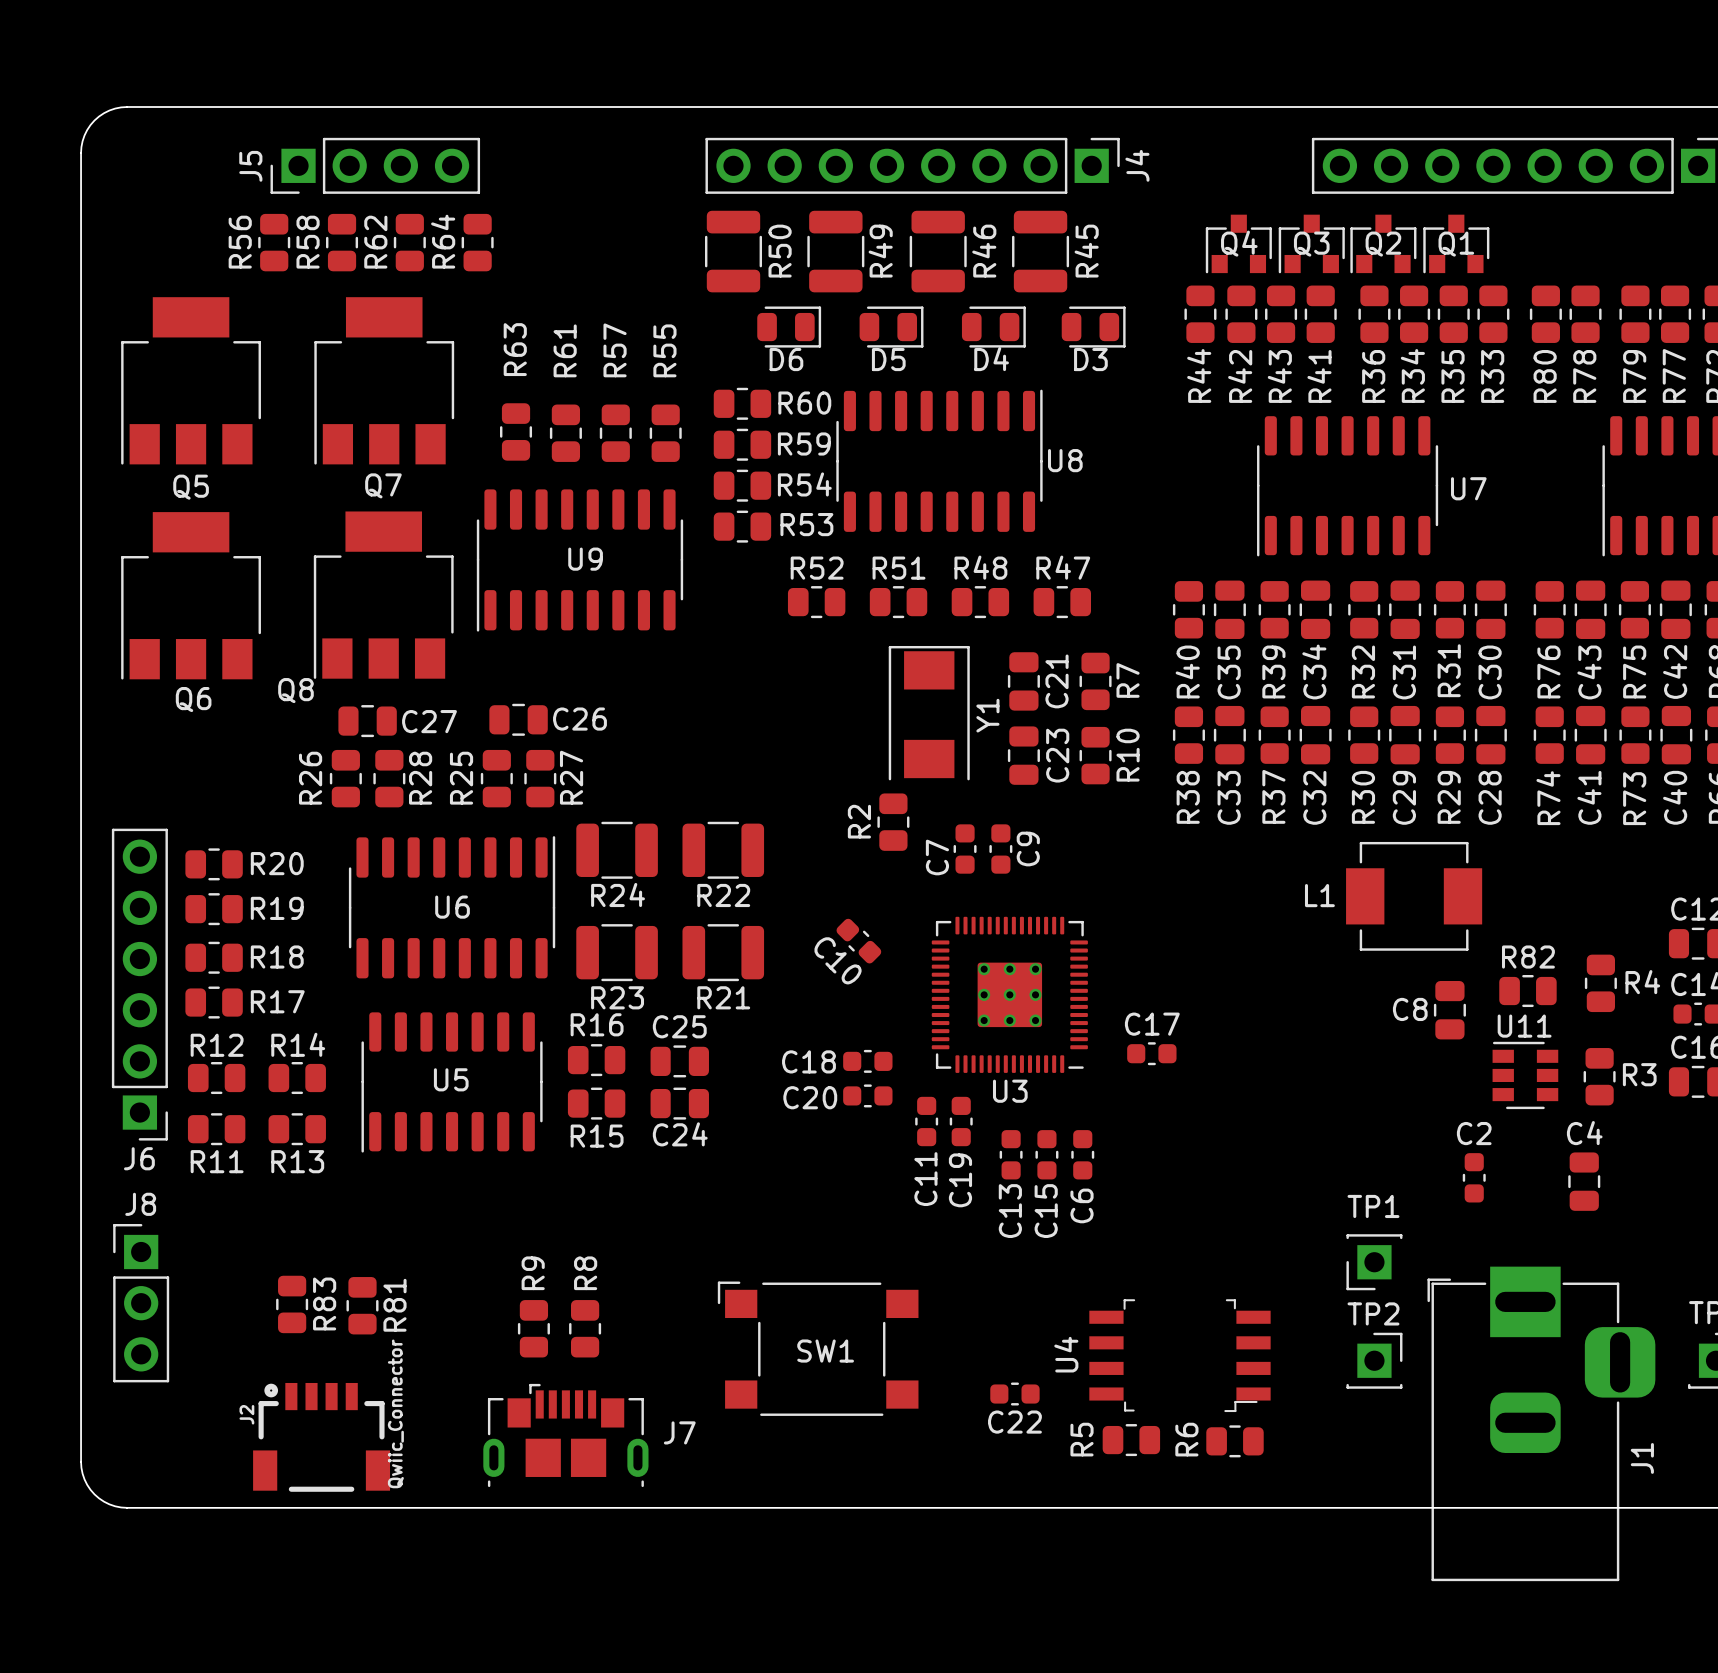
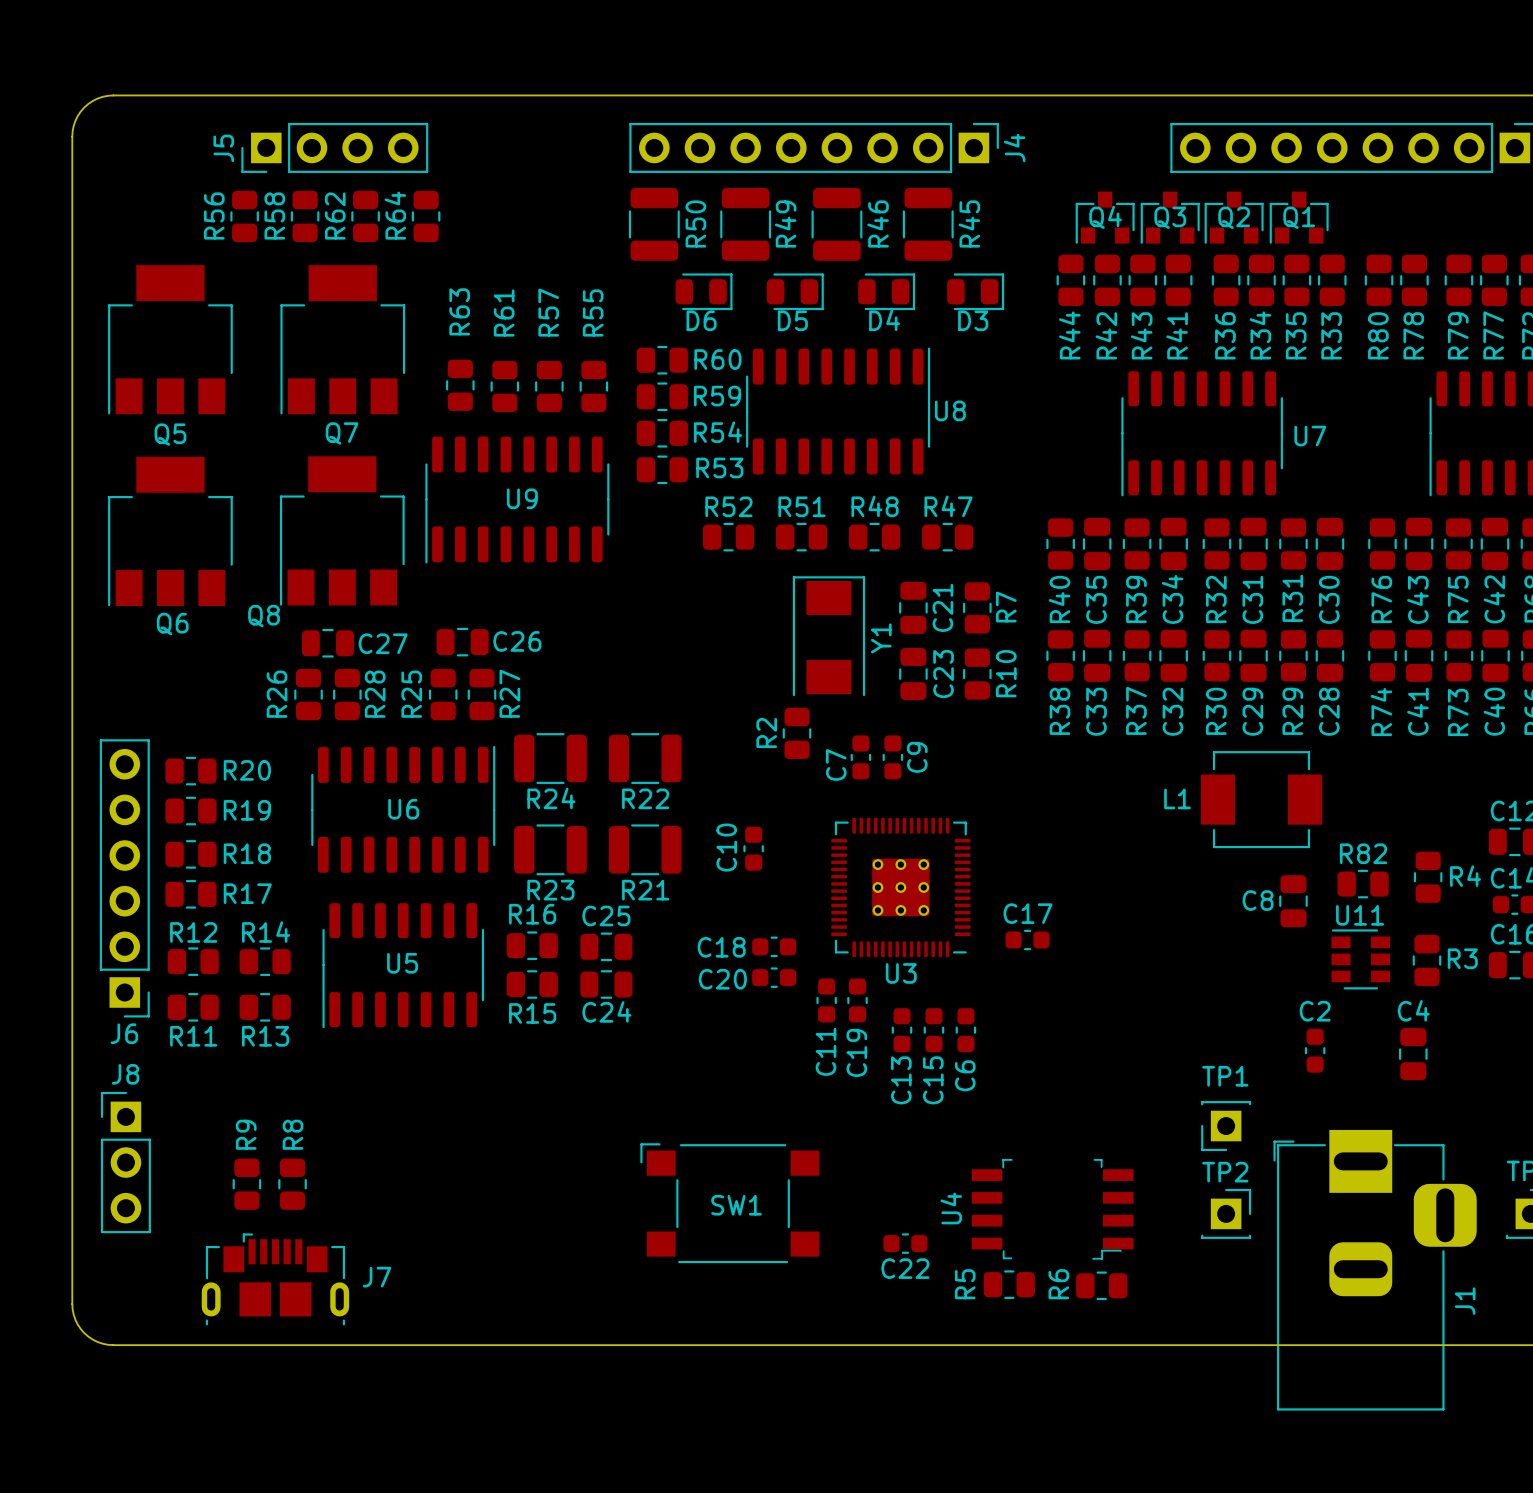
C10 rotation: 0° (858, 941) -> 45° clockwise (753, 848)
R83: (292, 1304) -> none
R81: (362, 1305) -> none
R9 position: (533, 1328) -> (246, 1184)
R8 position: (585, 1328) -> (292, 1184)
J7 footprint: [483, 1383, 649, 1488] -> [201, 1233, 350, 1326]
J2: Qwiic_Connector (321, 1437) -> none

